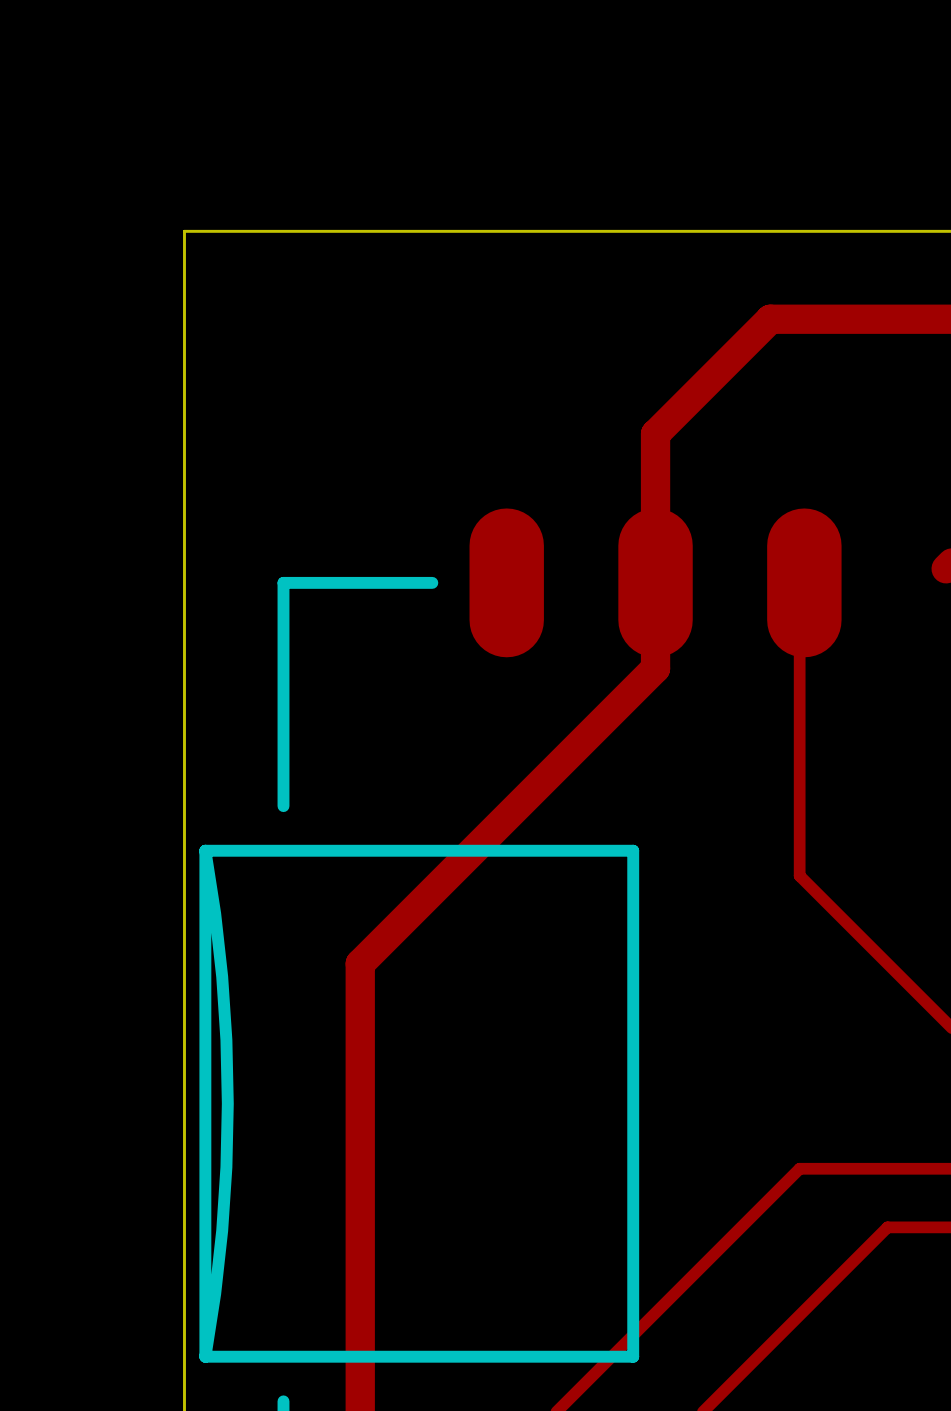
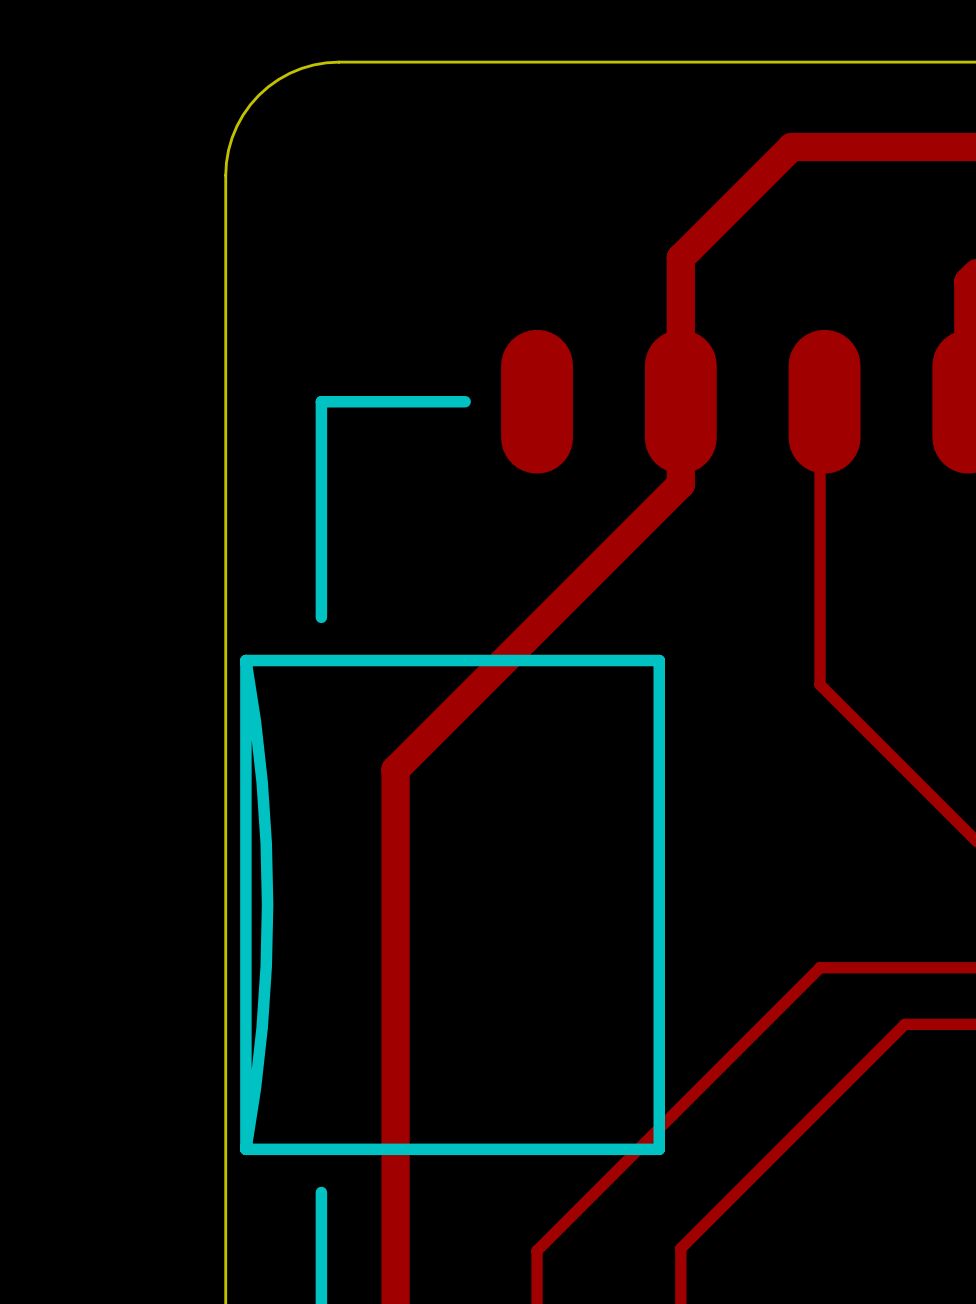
board edge: (301, 231) (184, 231) (184, 348) -> (338, 62) (313, 64) (289, 73) (258, 95) (243, 115) (232, 137) (225, 175)

